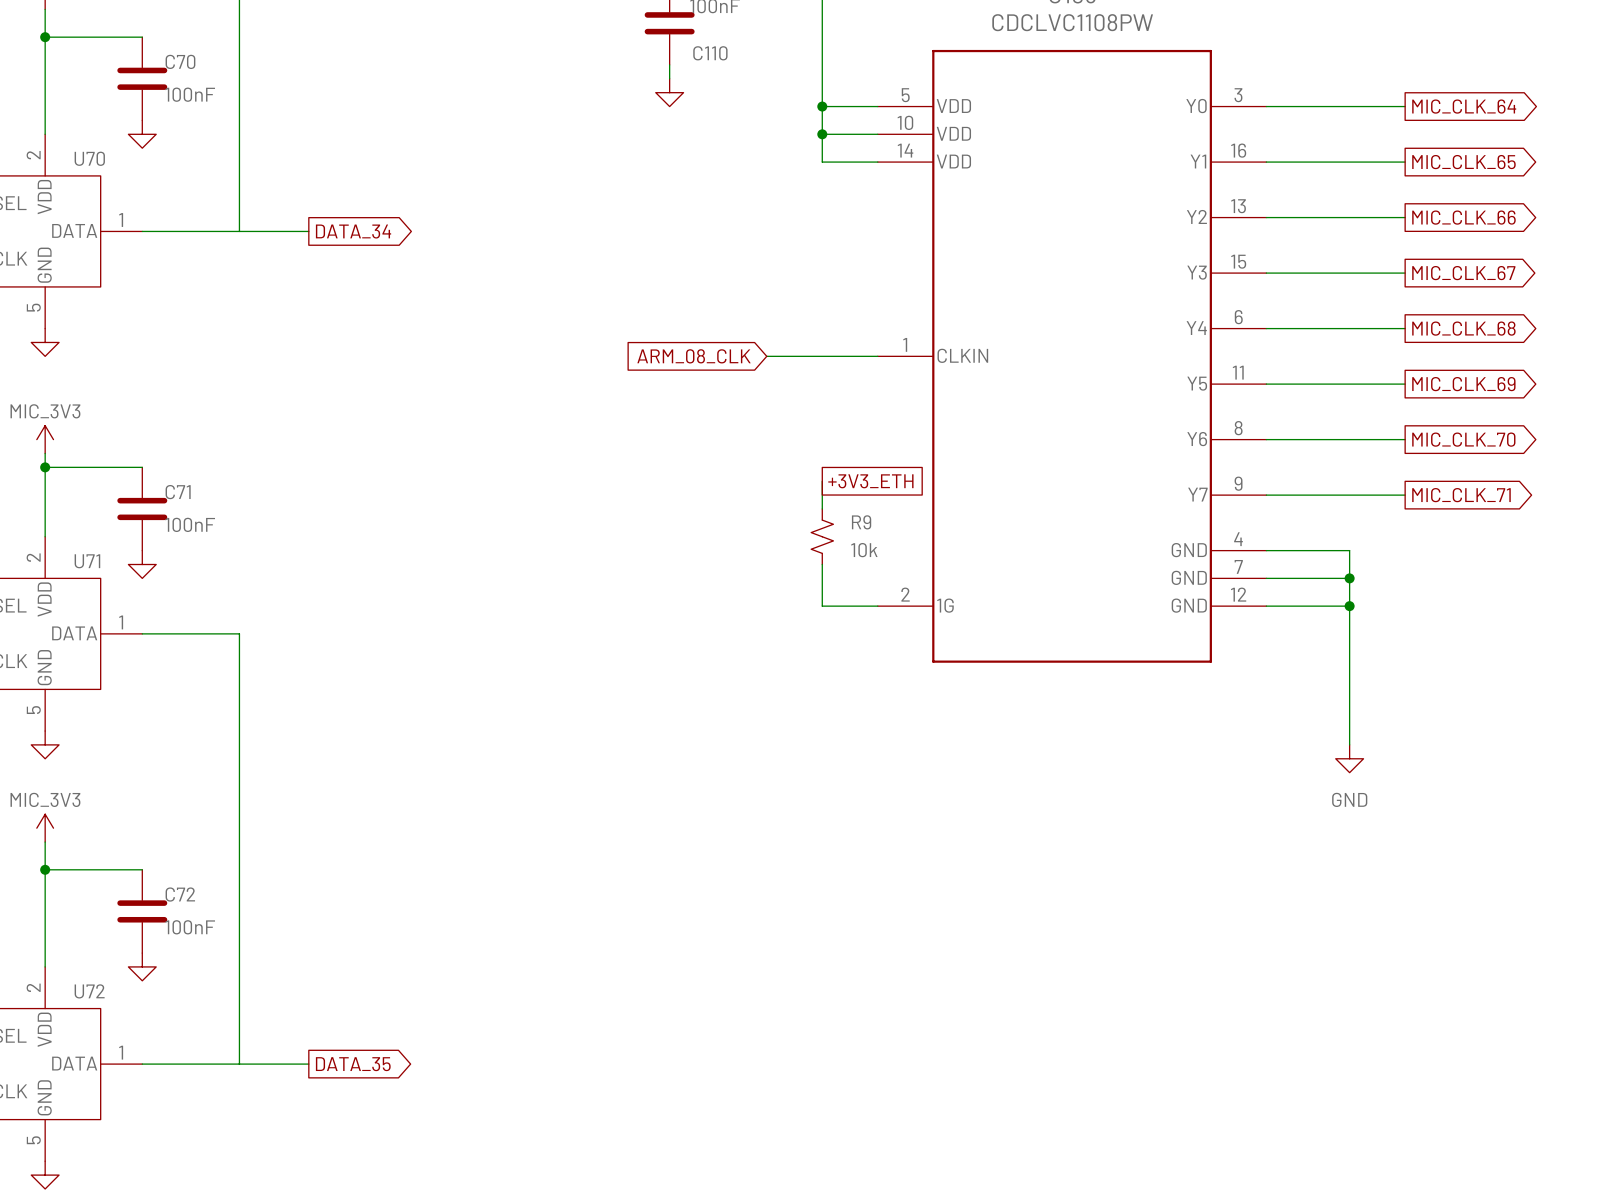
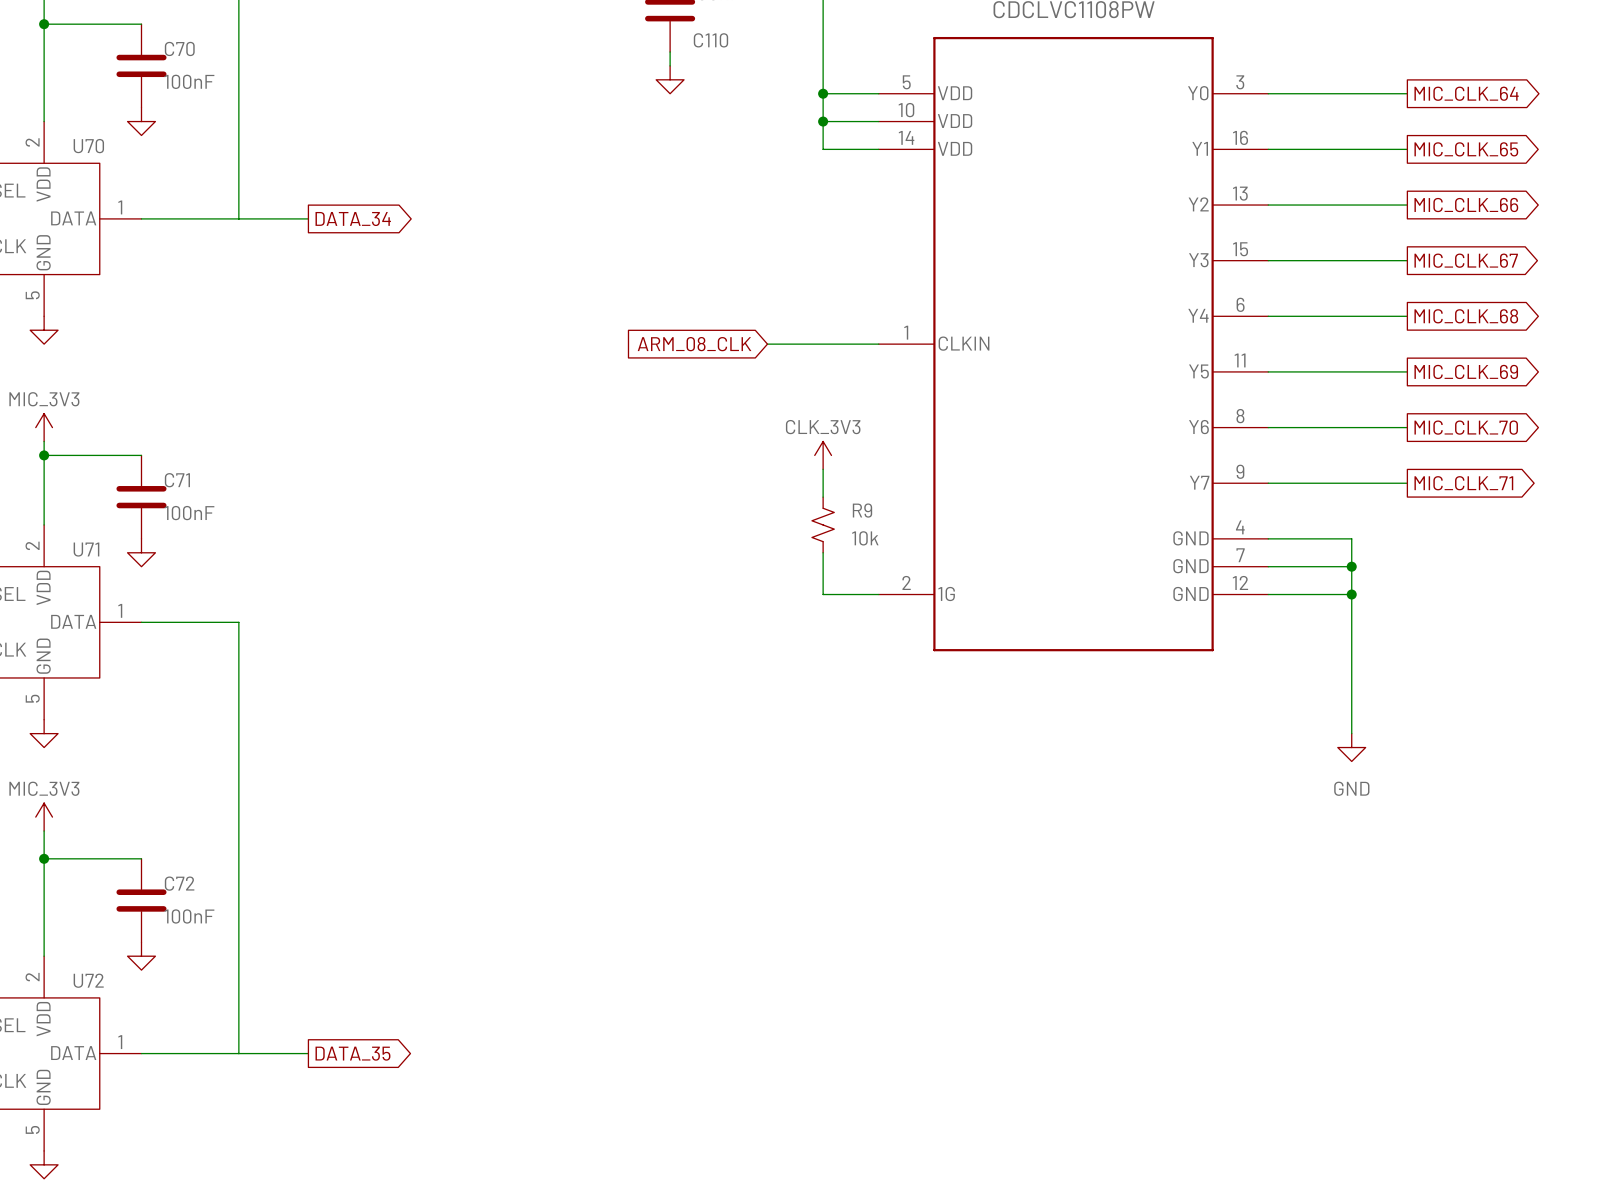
power symbol: none -> CLK_3V3 (823, 455)
global label: +3V3_ETH (870, 481) -> none

